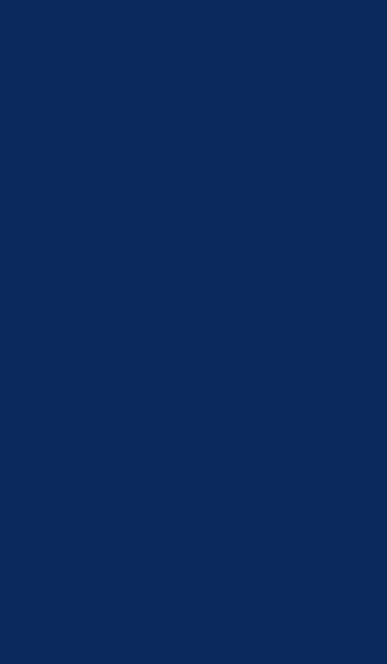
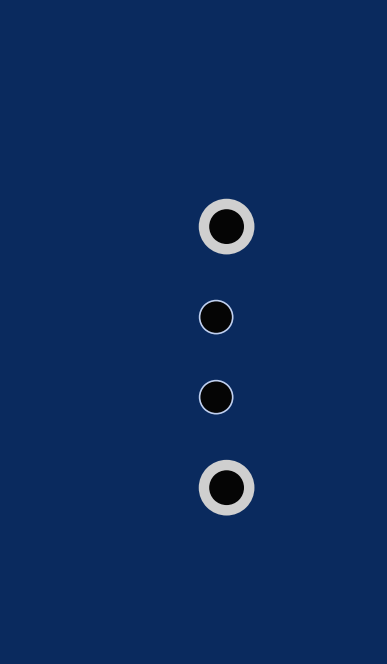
part: none -> (226, 357)

